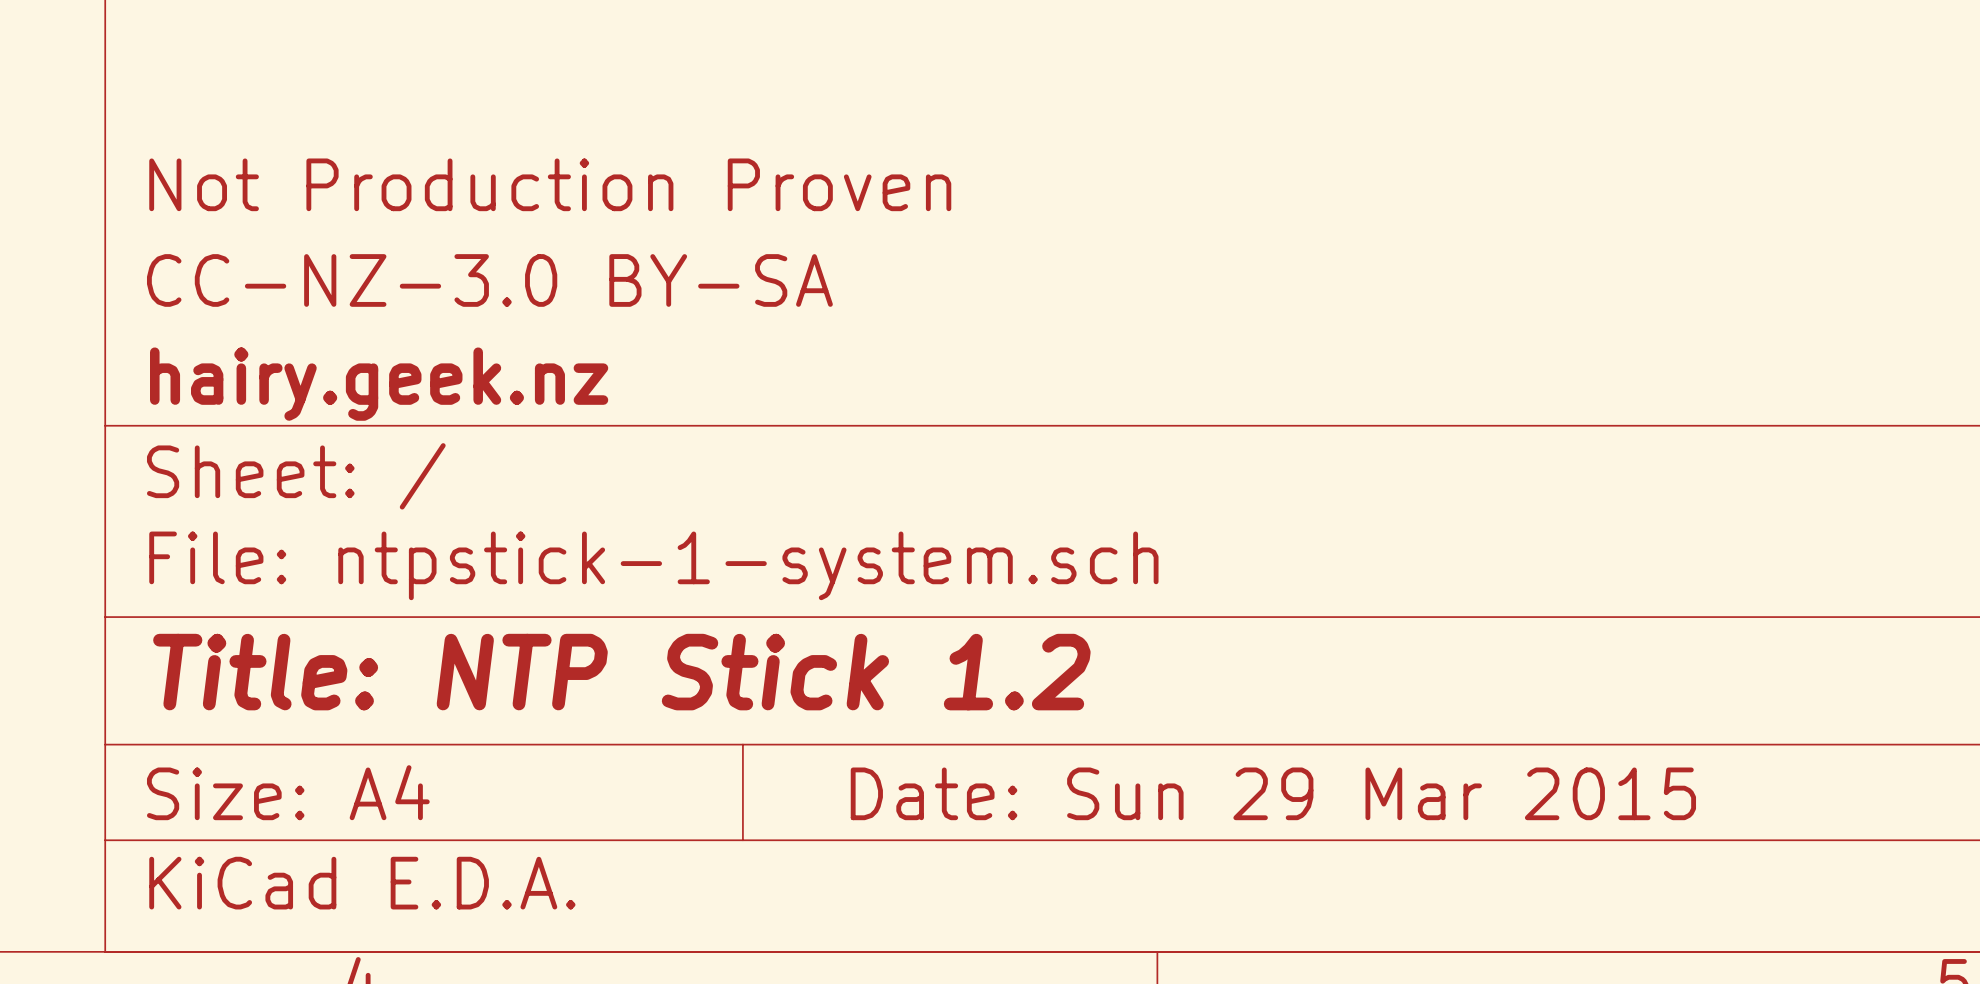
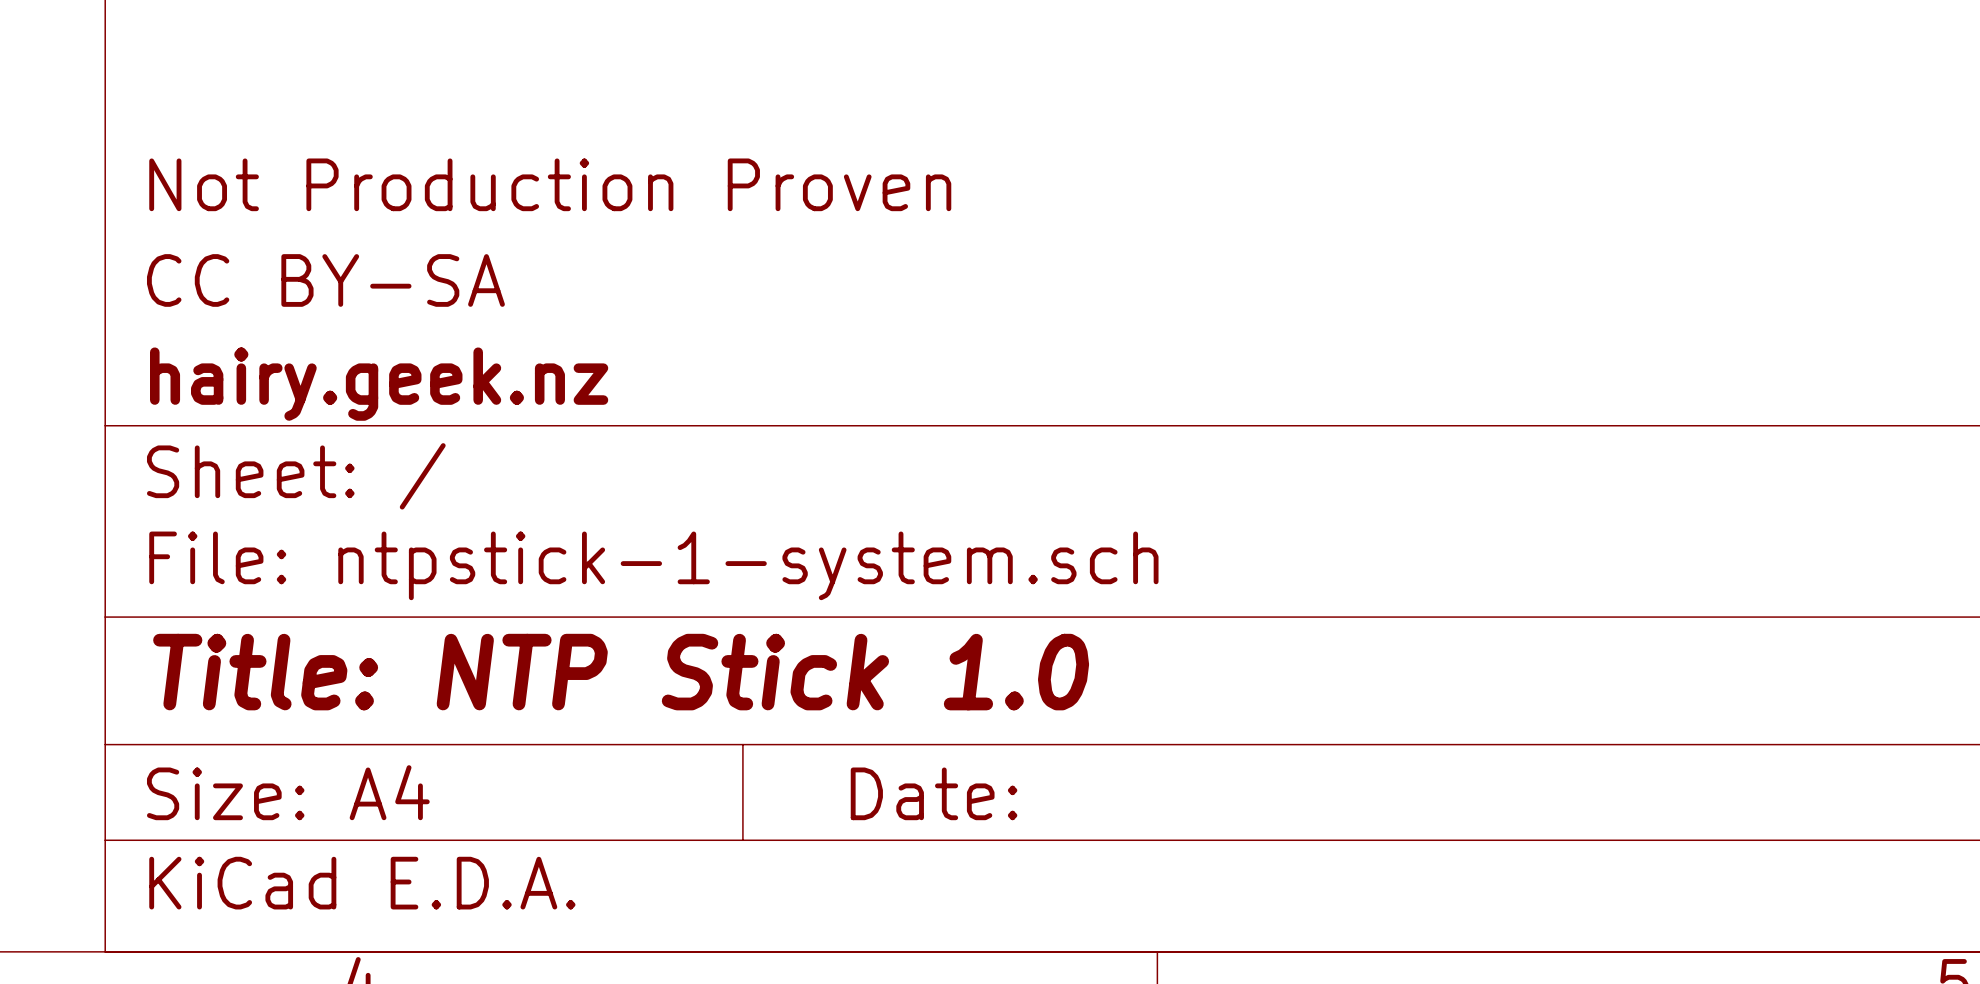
title block: CC-NZ-3.0 BY-SA (489, 280) -> CC BY-SA (325, 280)
title block: Title: NTP Stick 1.2 (621, 672) -> Title: NTP Stick 1.0 (621, 672)
title block: Date: Sun 29 Mar 2015 (1273, 793) -> Date: (934, 793)

